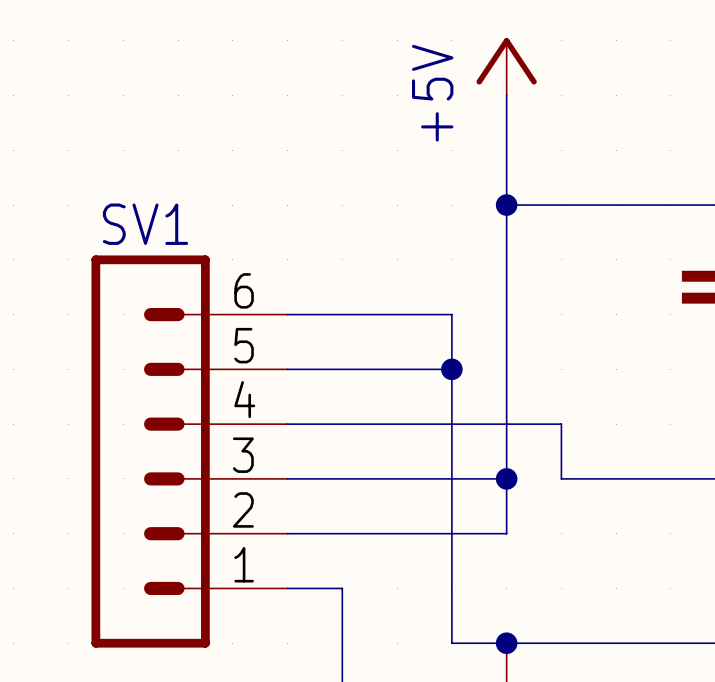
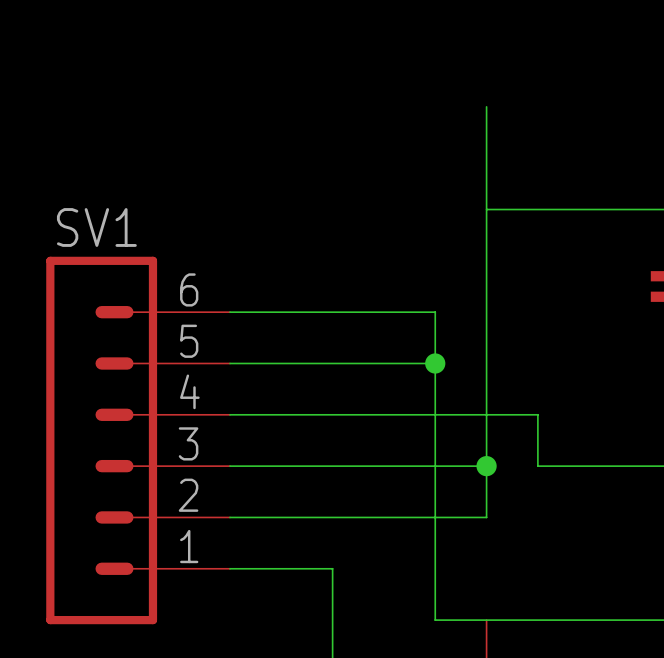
power symbol: +5V (506, 66) -> none
junction: (506, 205) -> none
SV1 position: (189, 451) -> (138, 440)
junction: (506, 643) -> none

